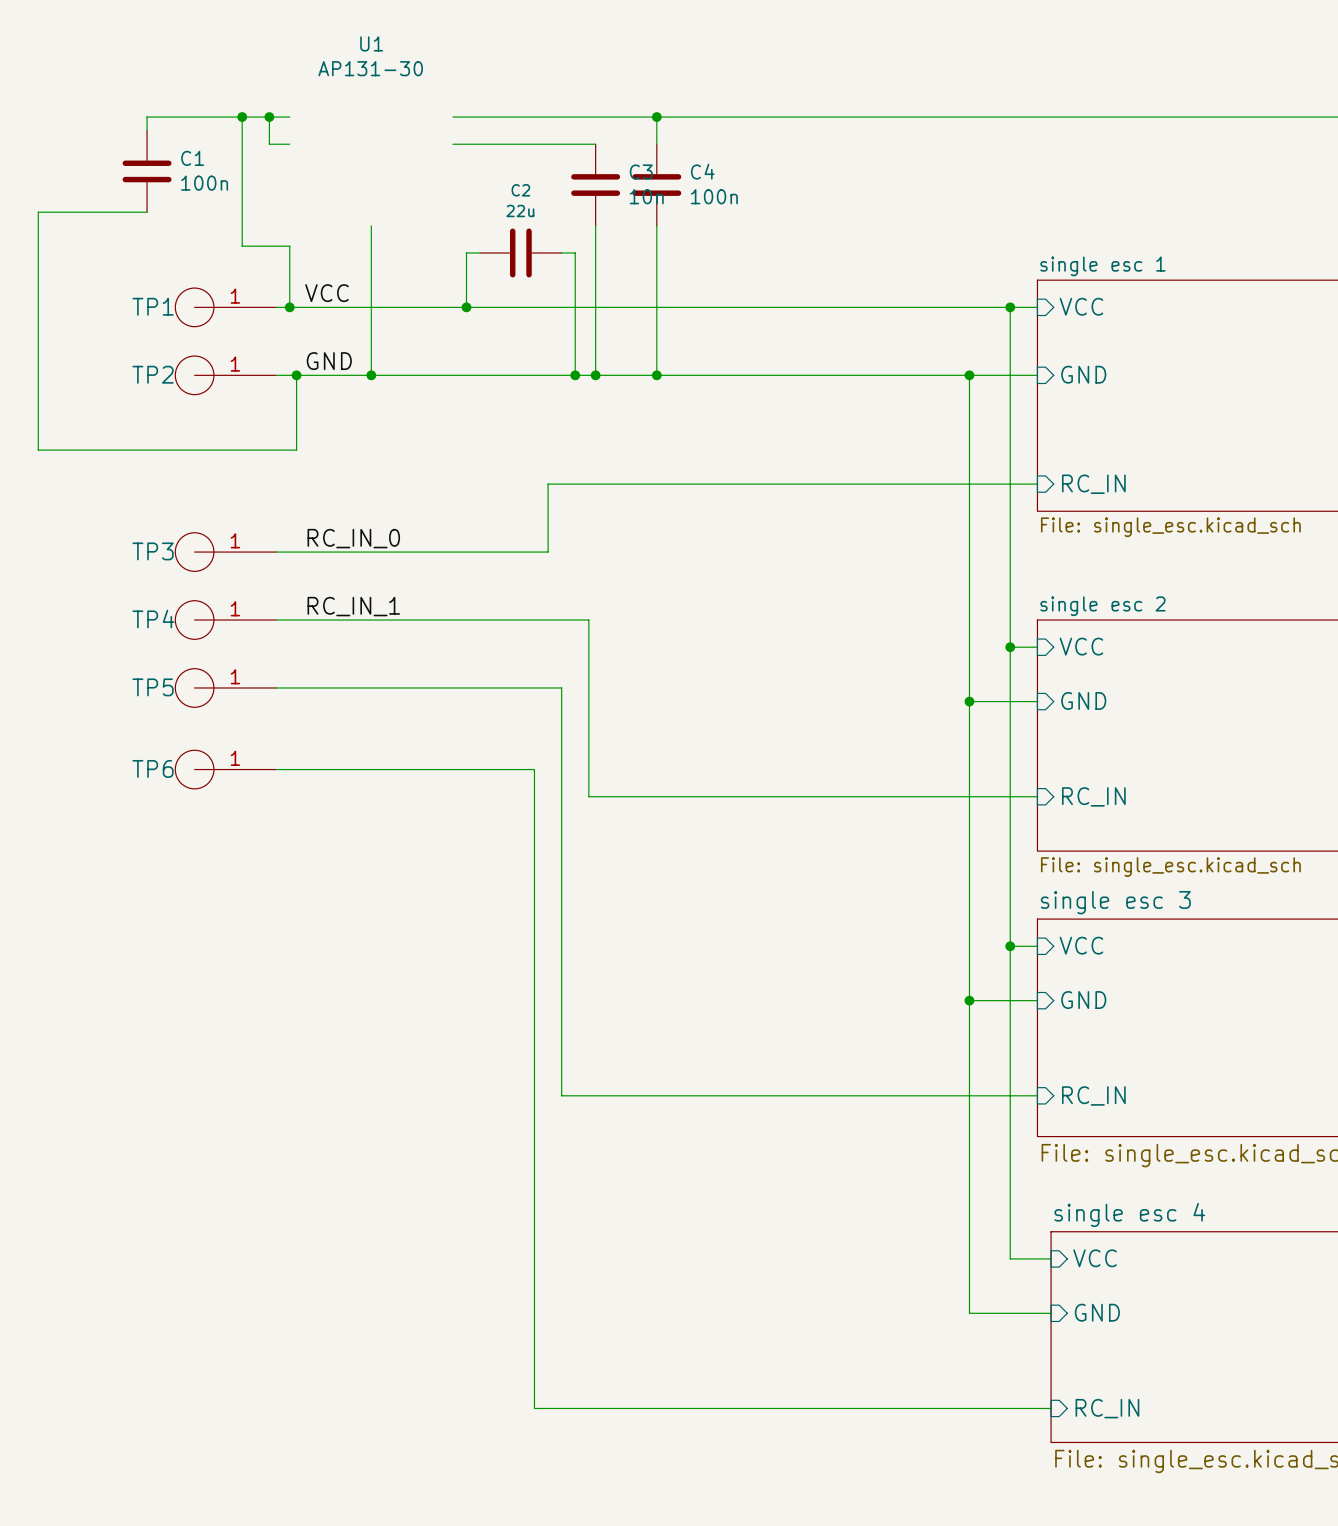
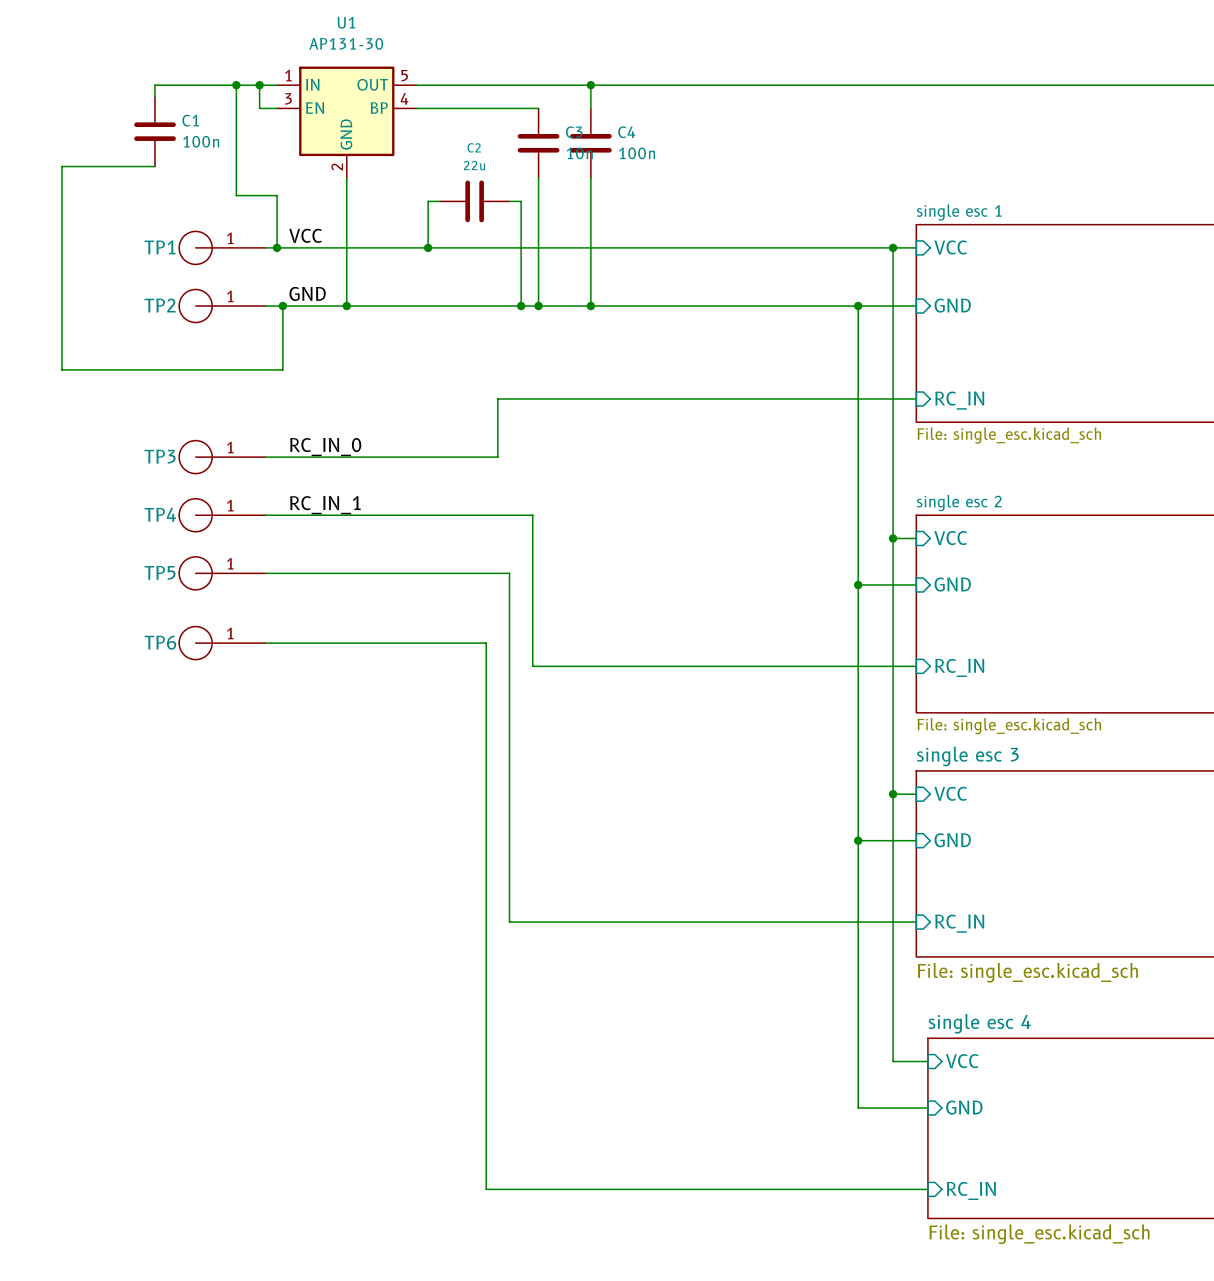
U1 symbol: [318, 36, 423, 77] -> [277, 66, 417, 179]

